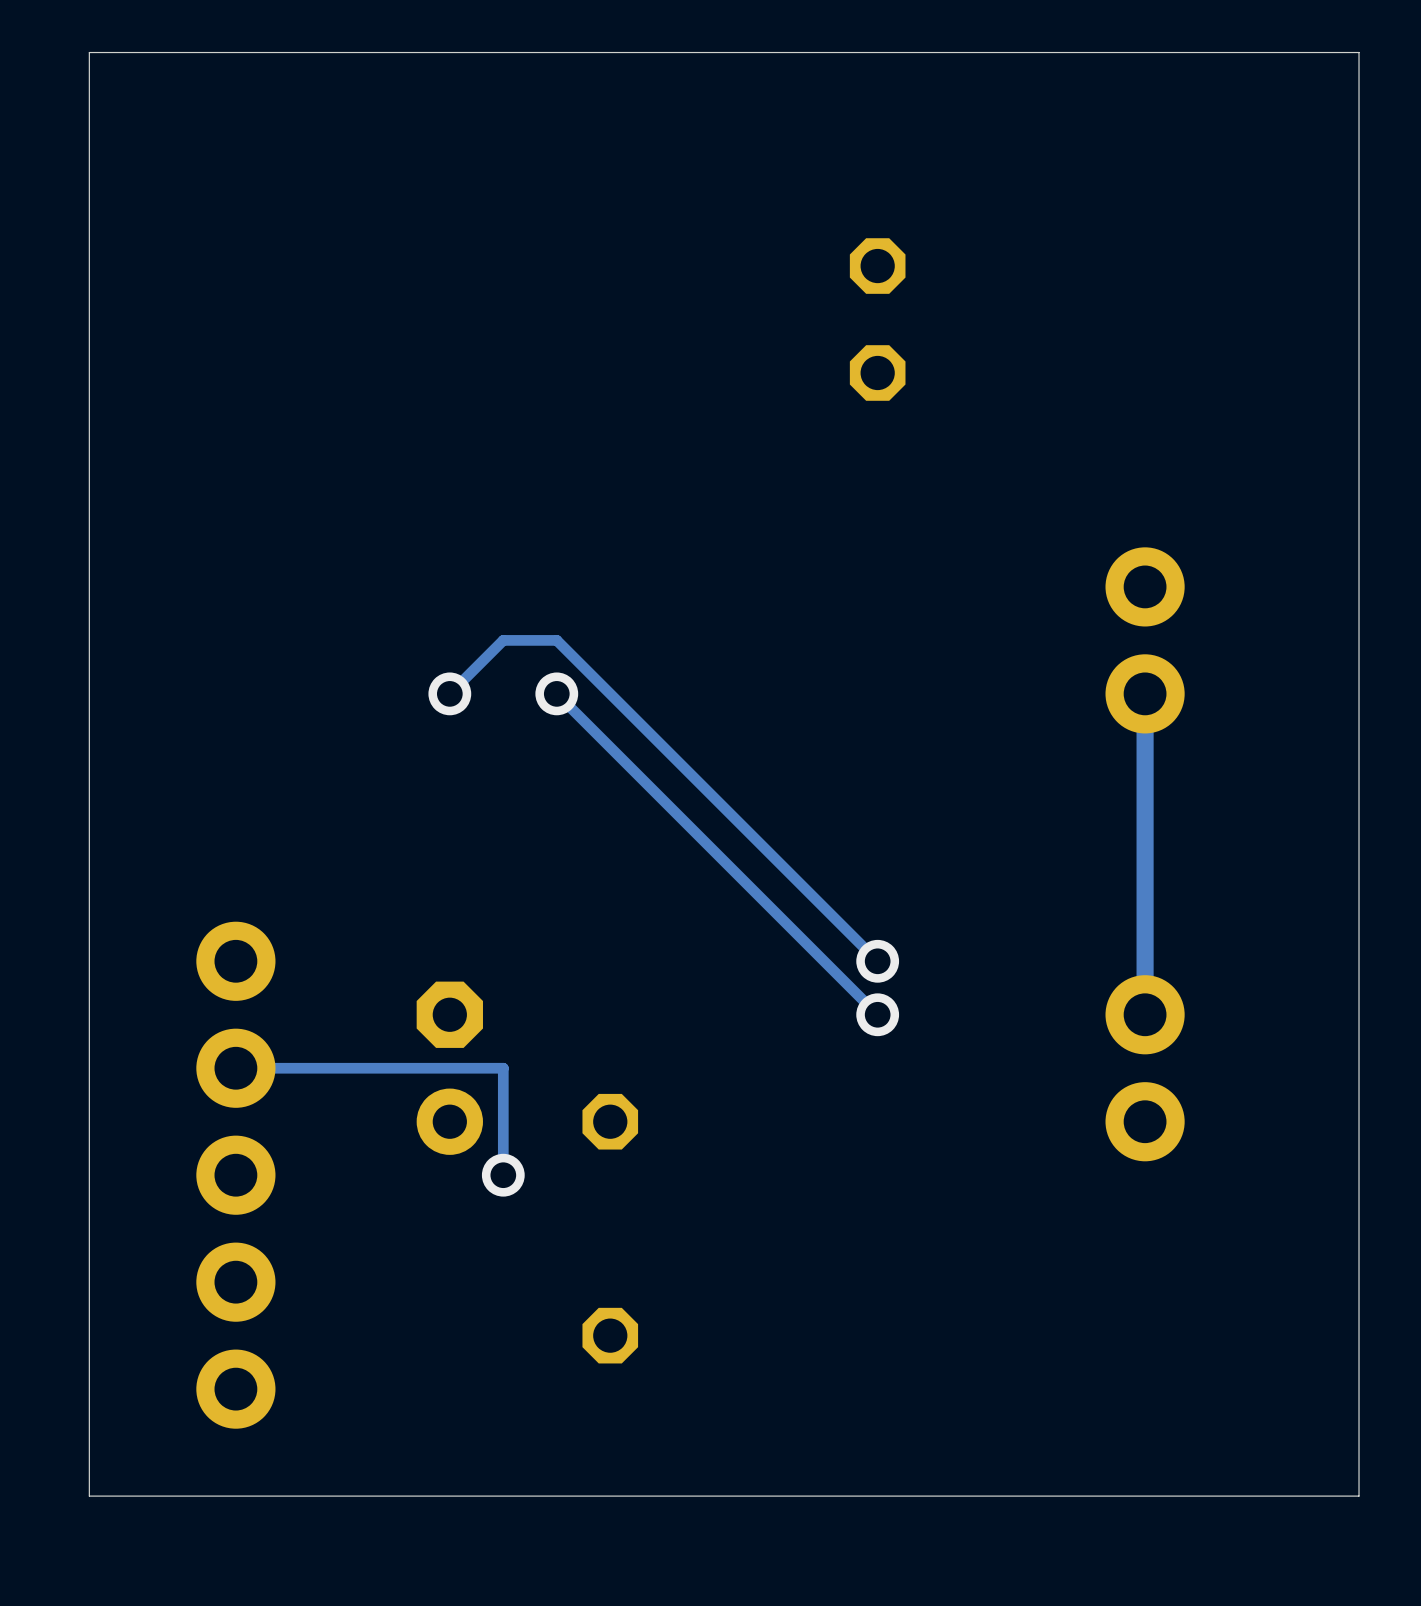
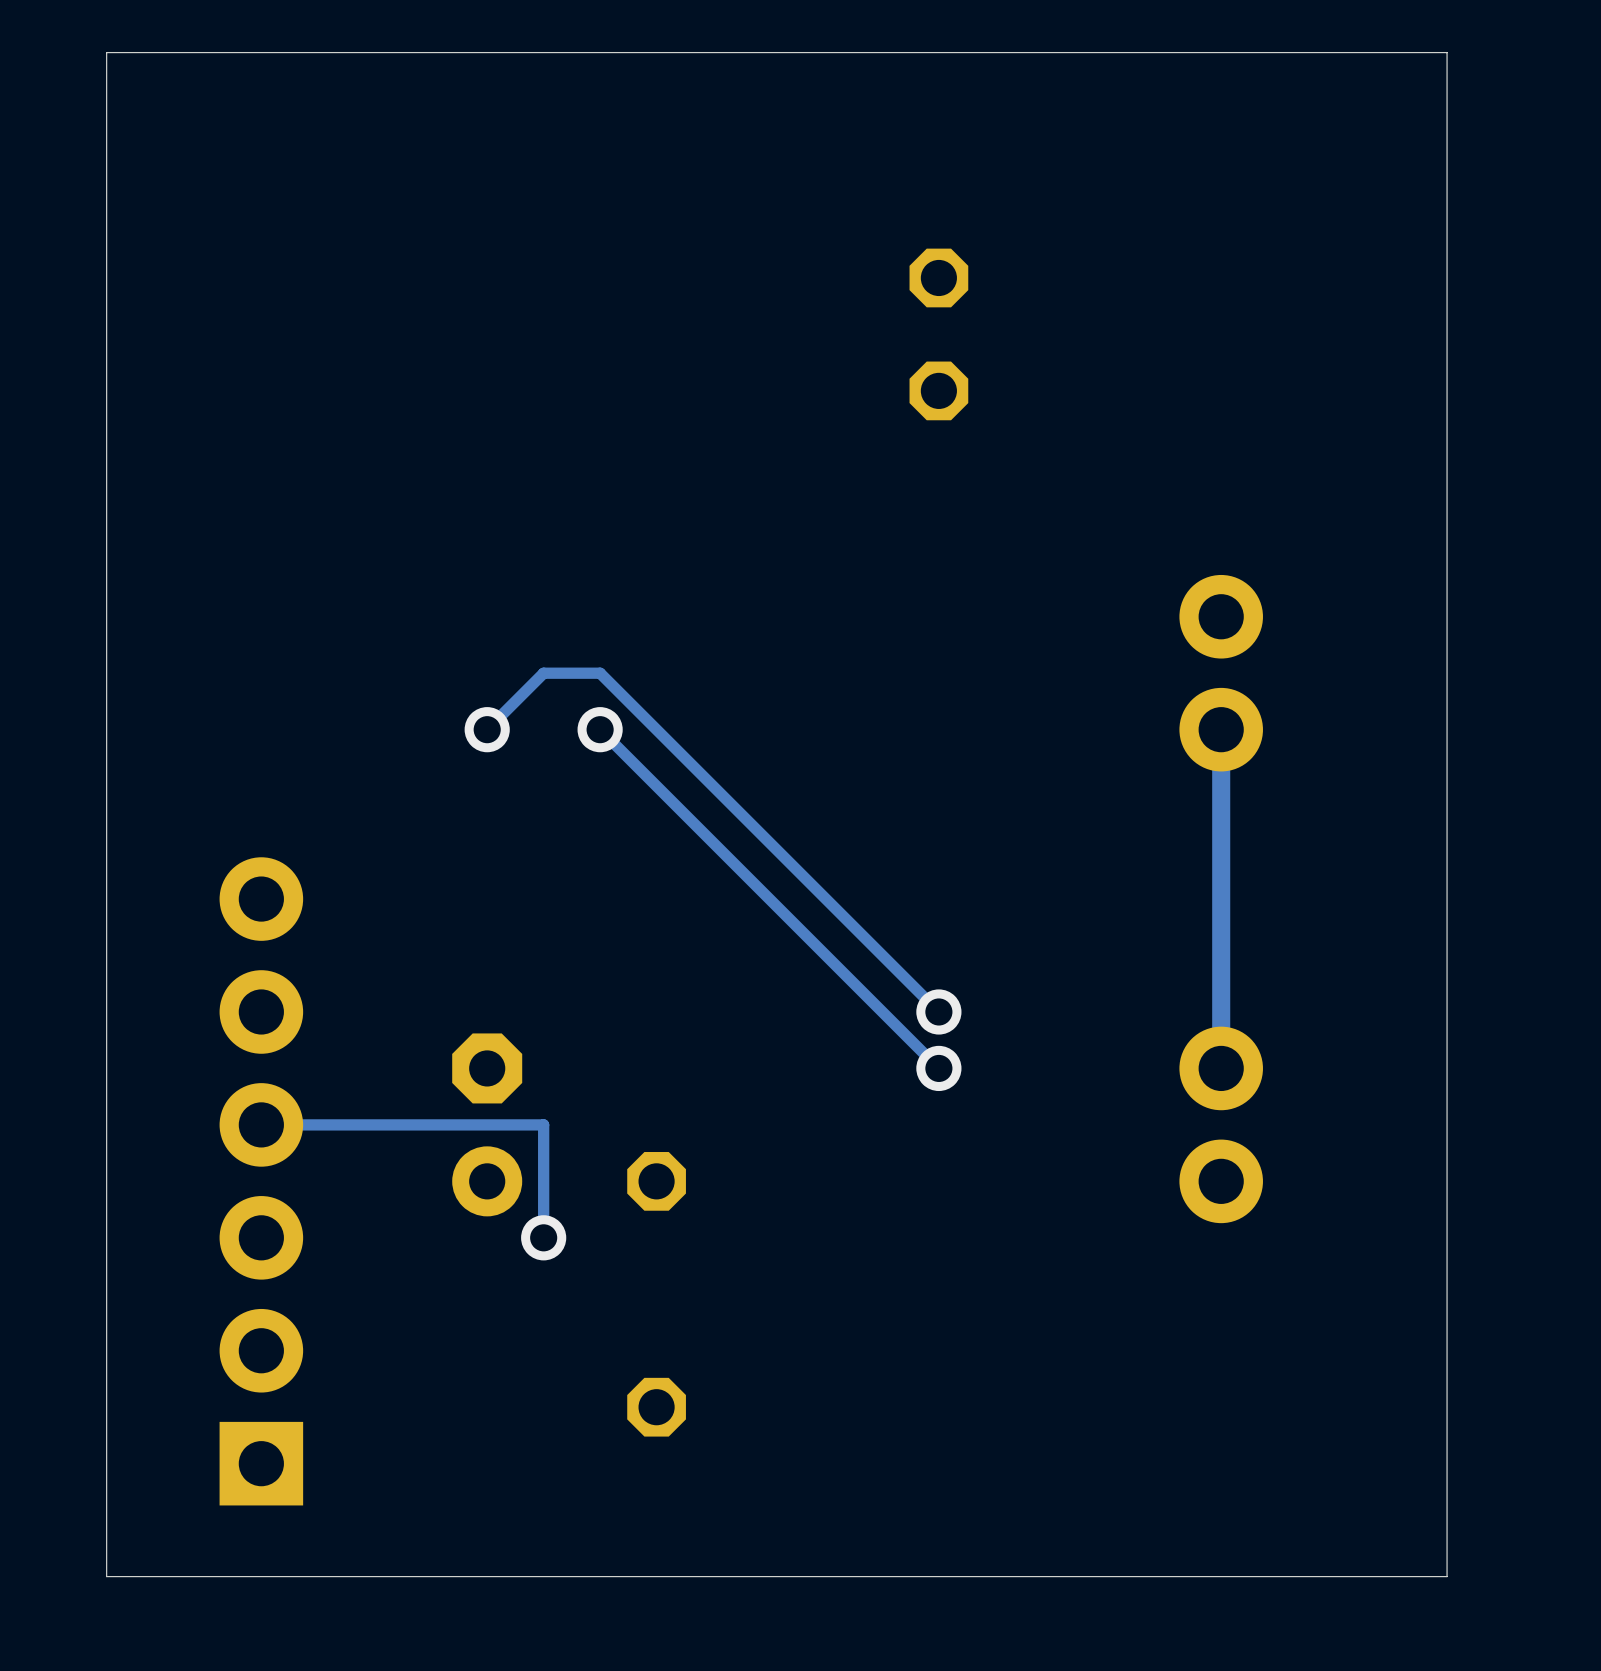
part: none -> (261, 1181)
part: (235, 1175) -> none

